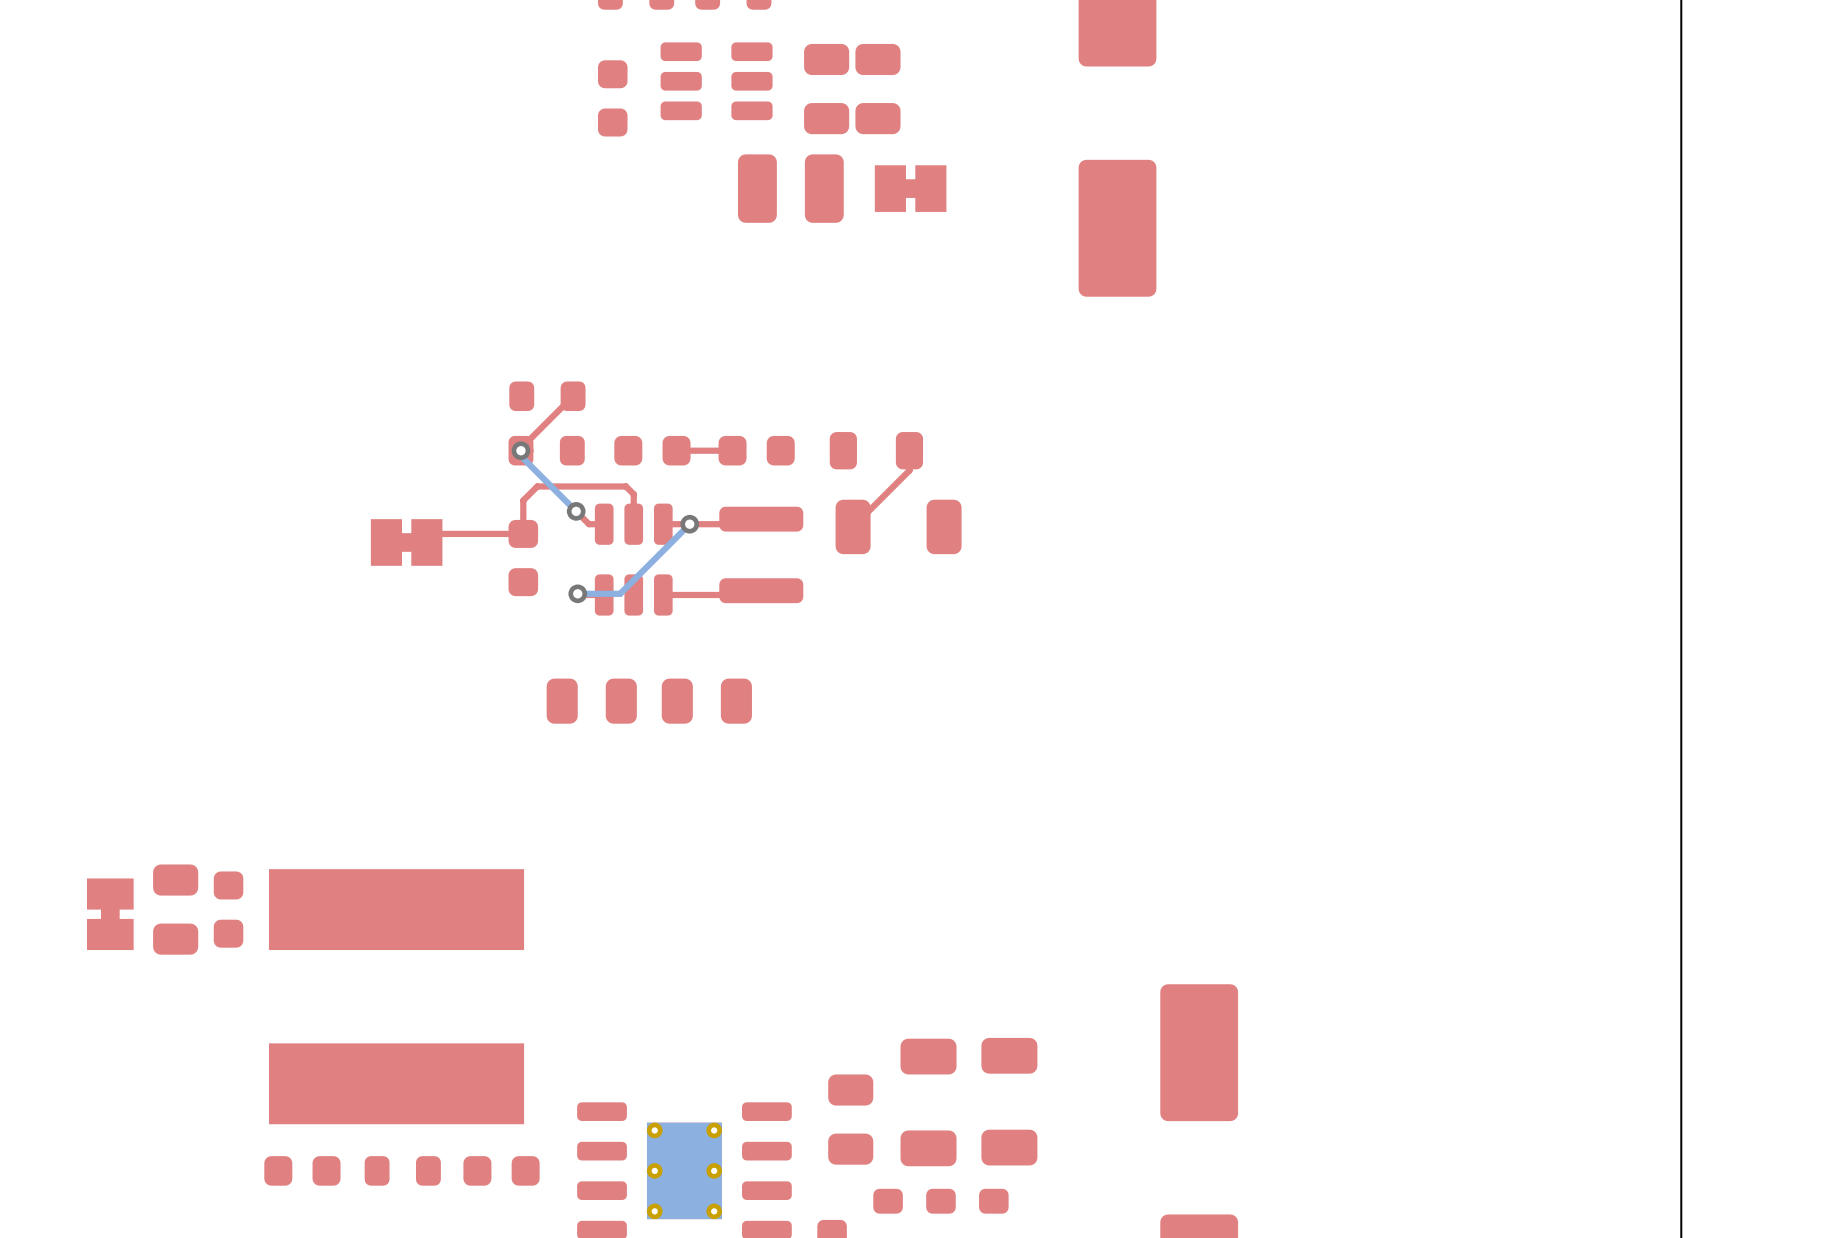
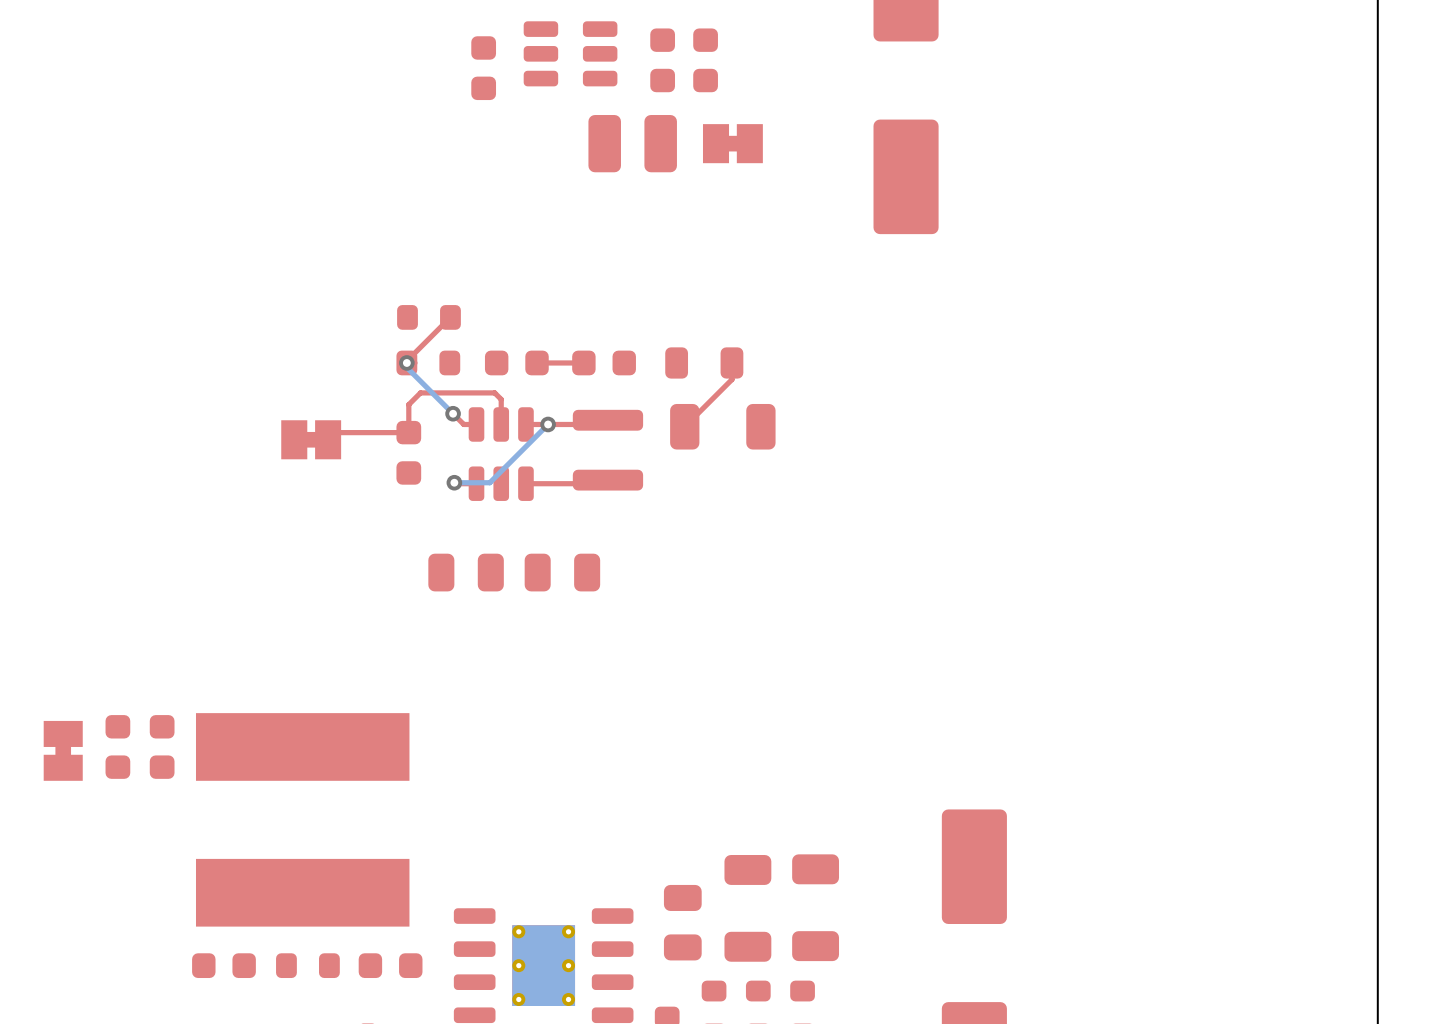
part footprint: [804, 43, 850, 135] -> [650, 28, 676, 93]
part footprint: [855, 43, 901, 135] -> [693, 28, 718, 93]
part footprint: [153, 864, 199, 955] -> [105, 715, 131, 779]

